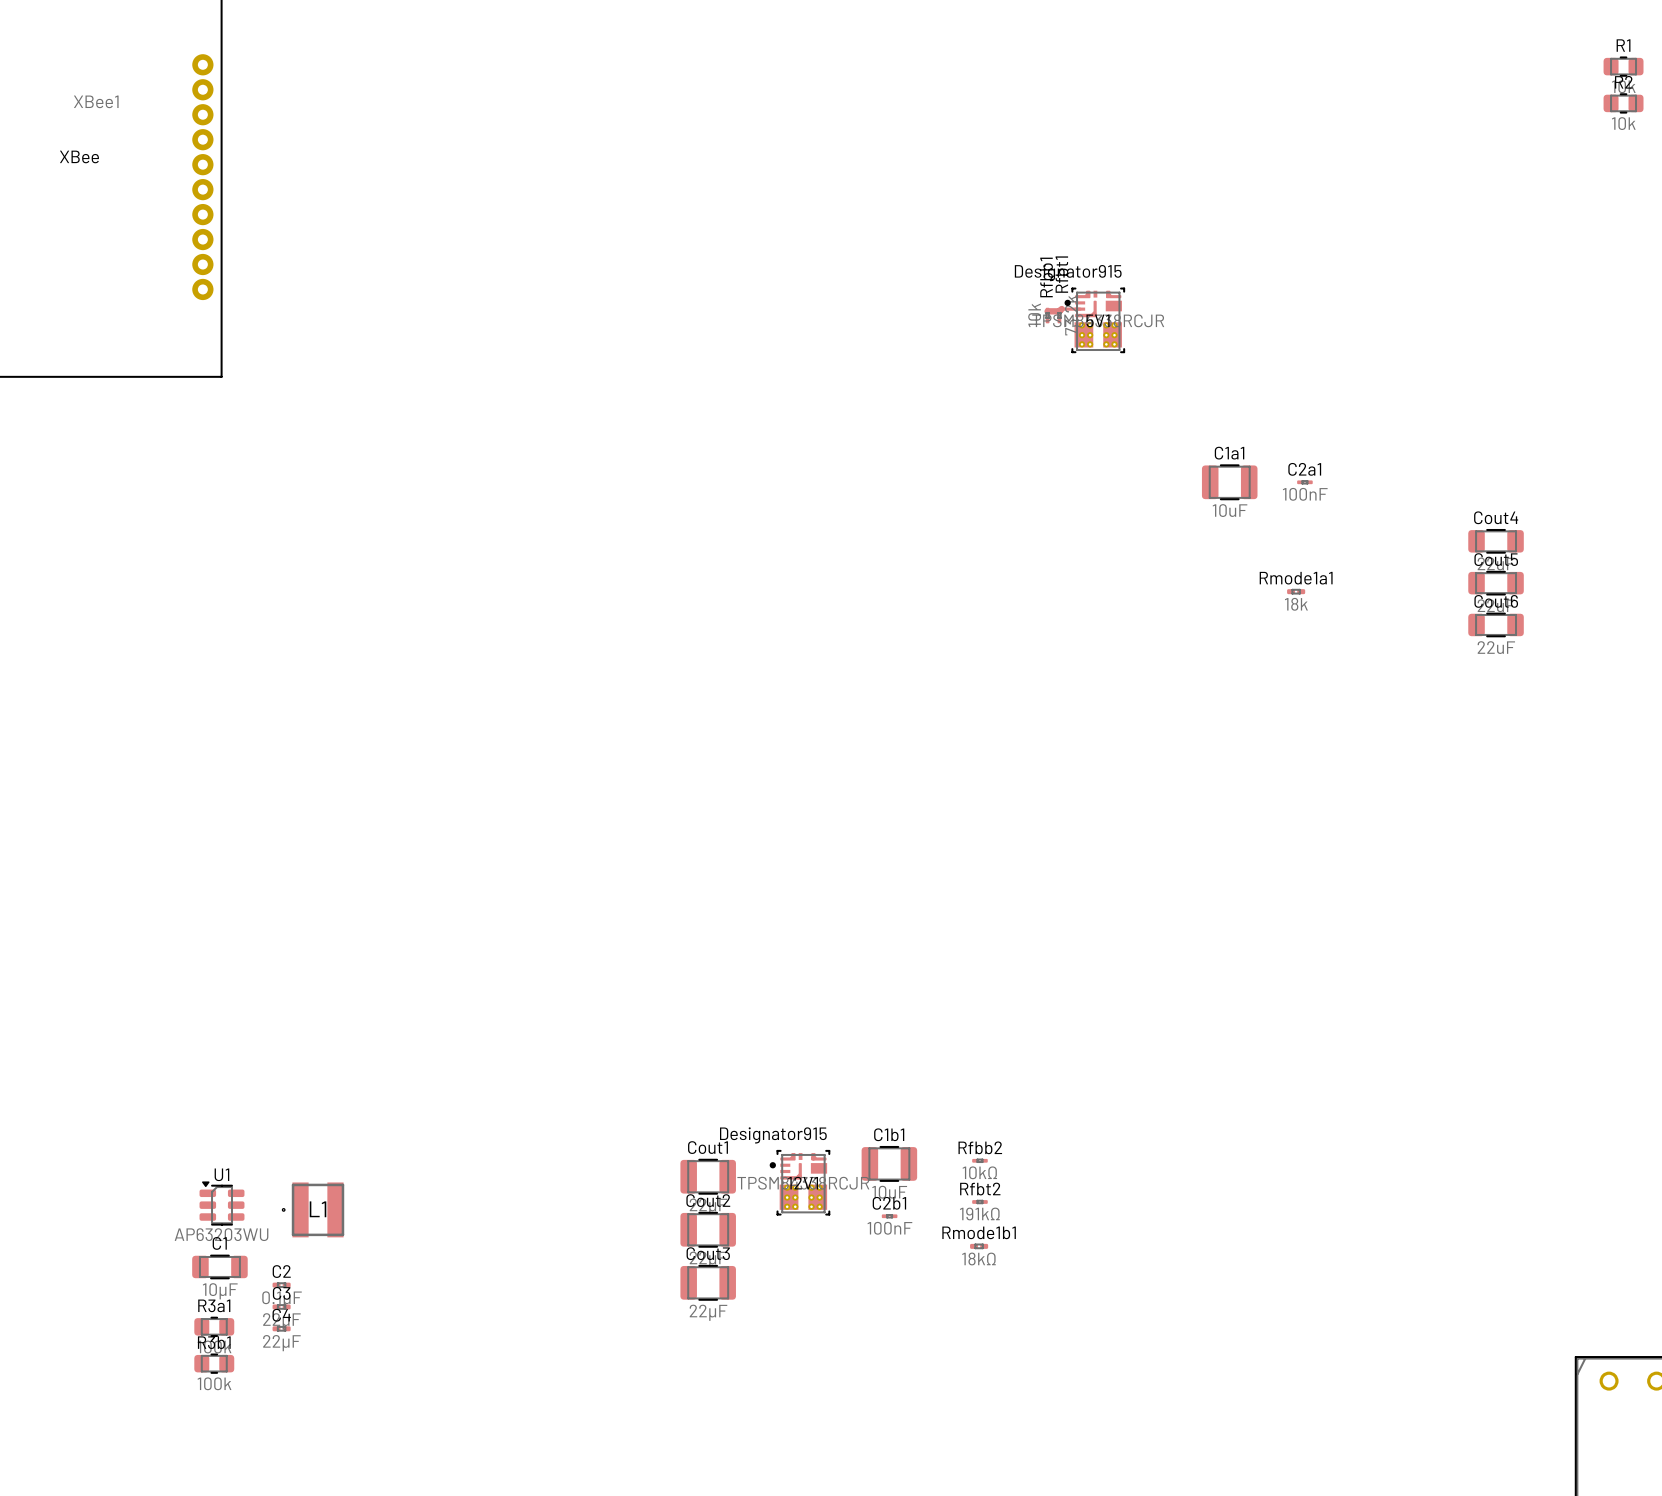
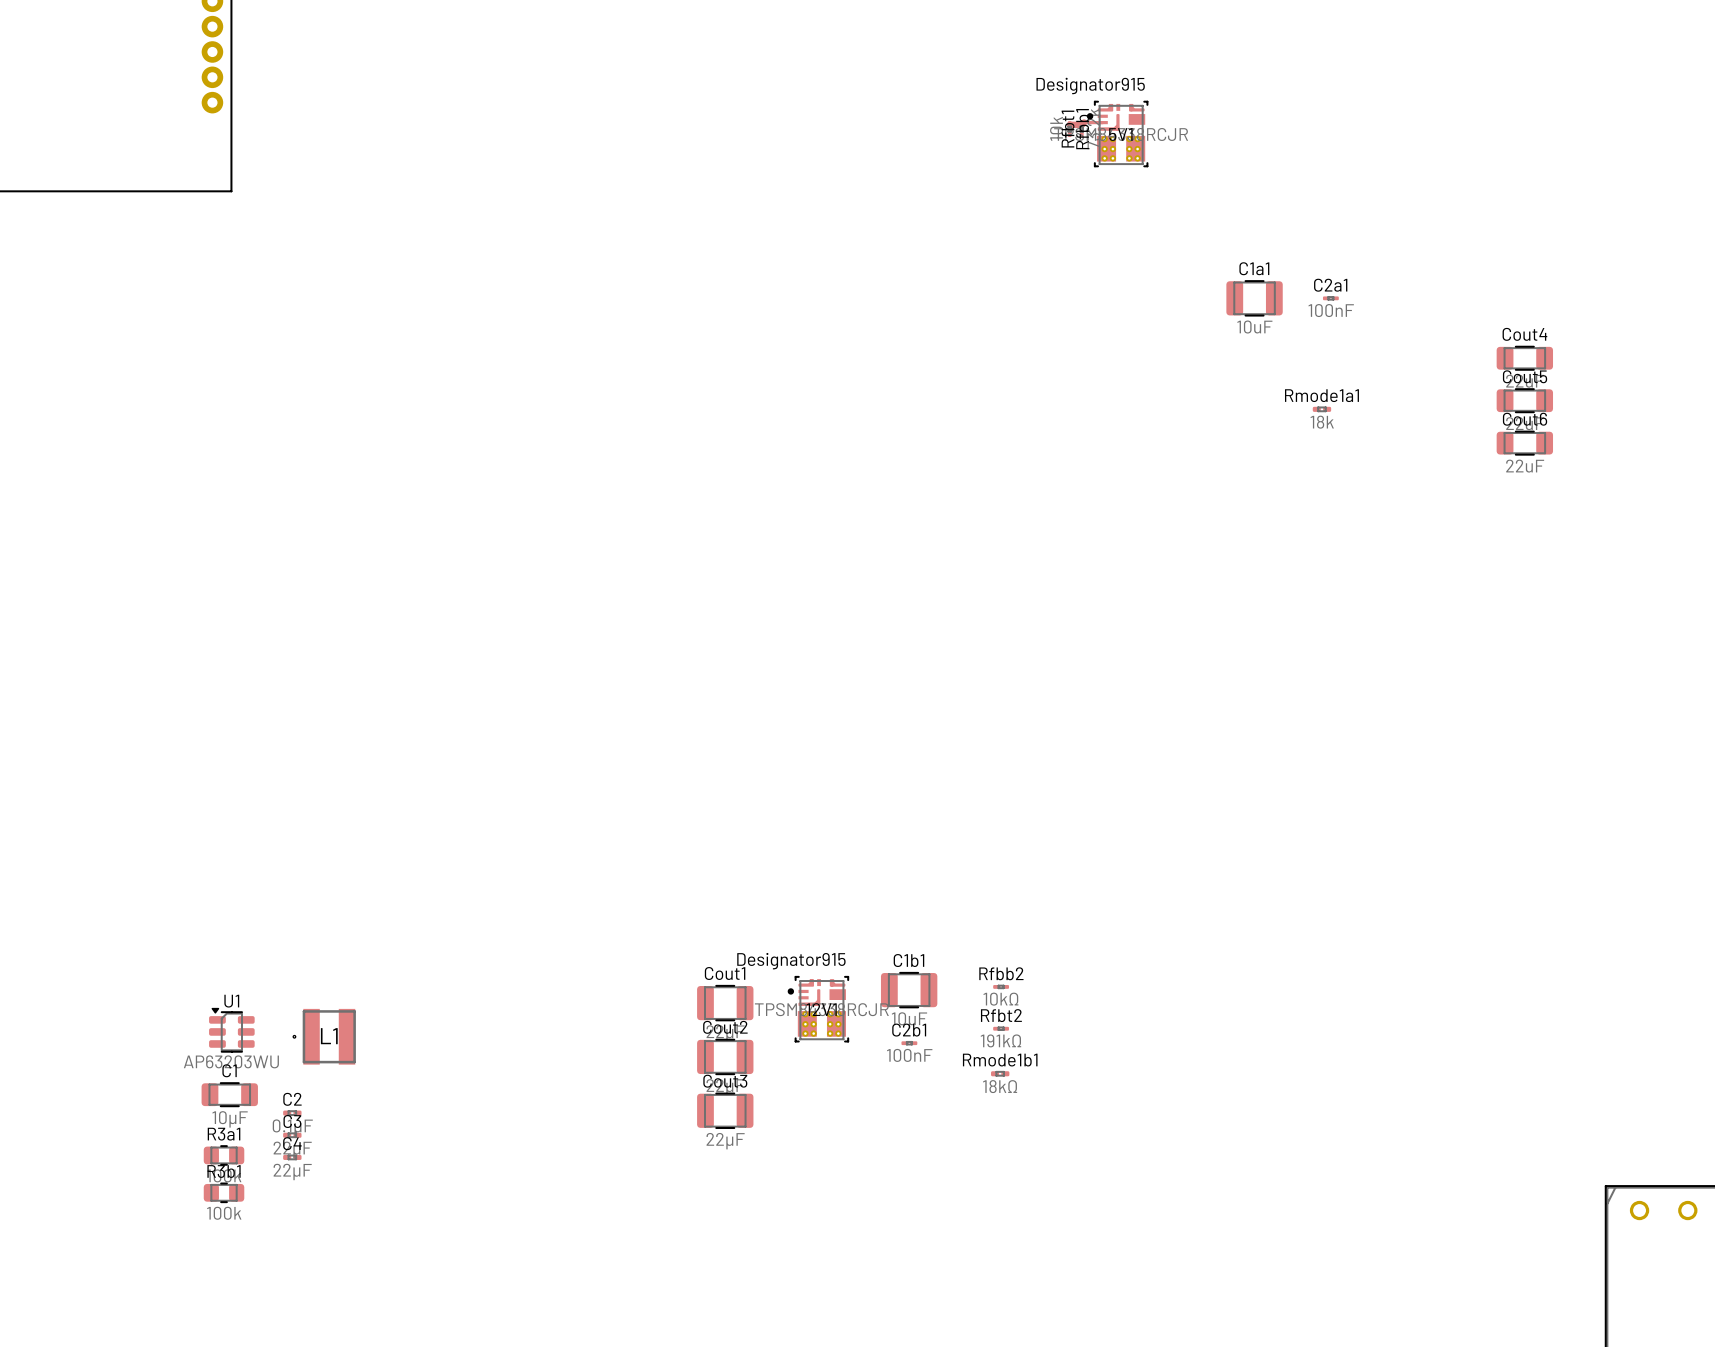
Rfbt1 name position: Rfbt1 (1061, 274) -> Rfbt1 (1068, 129)
Rfbb1 name position: Rfbb1 (1046, 277) -> Rfbb1 (1082, 129)

